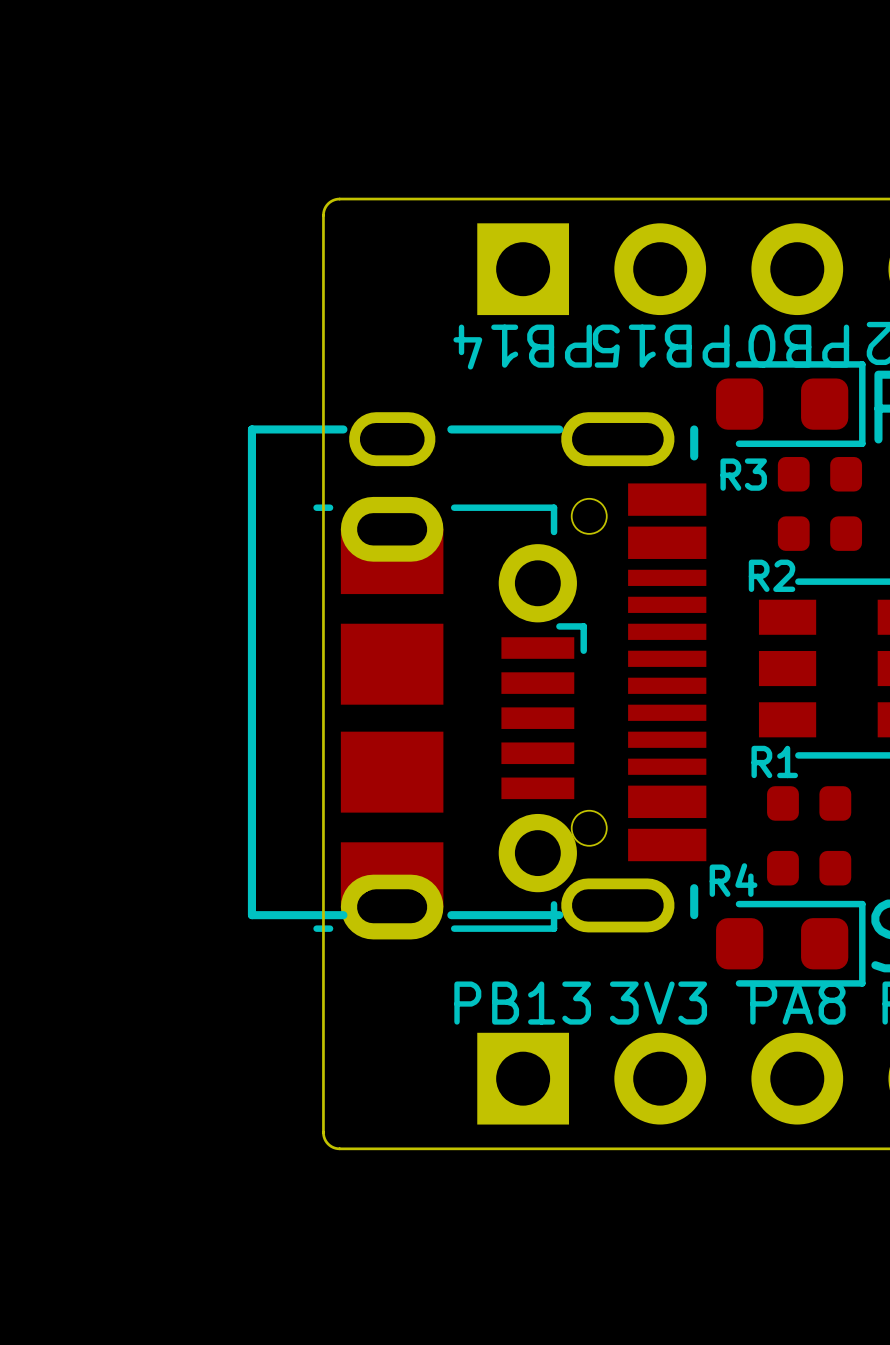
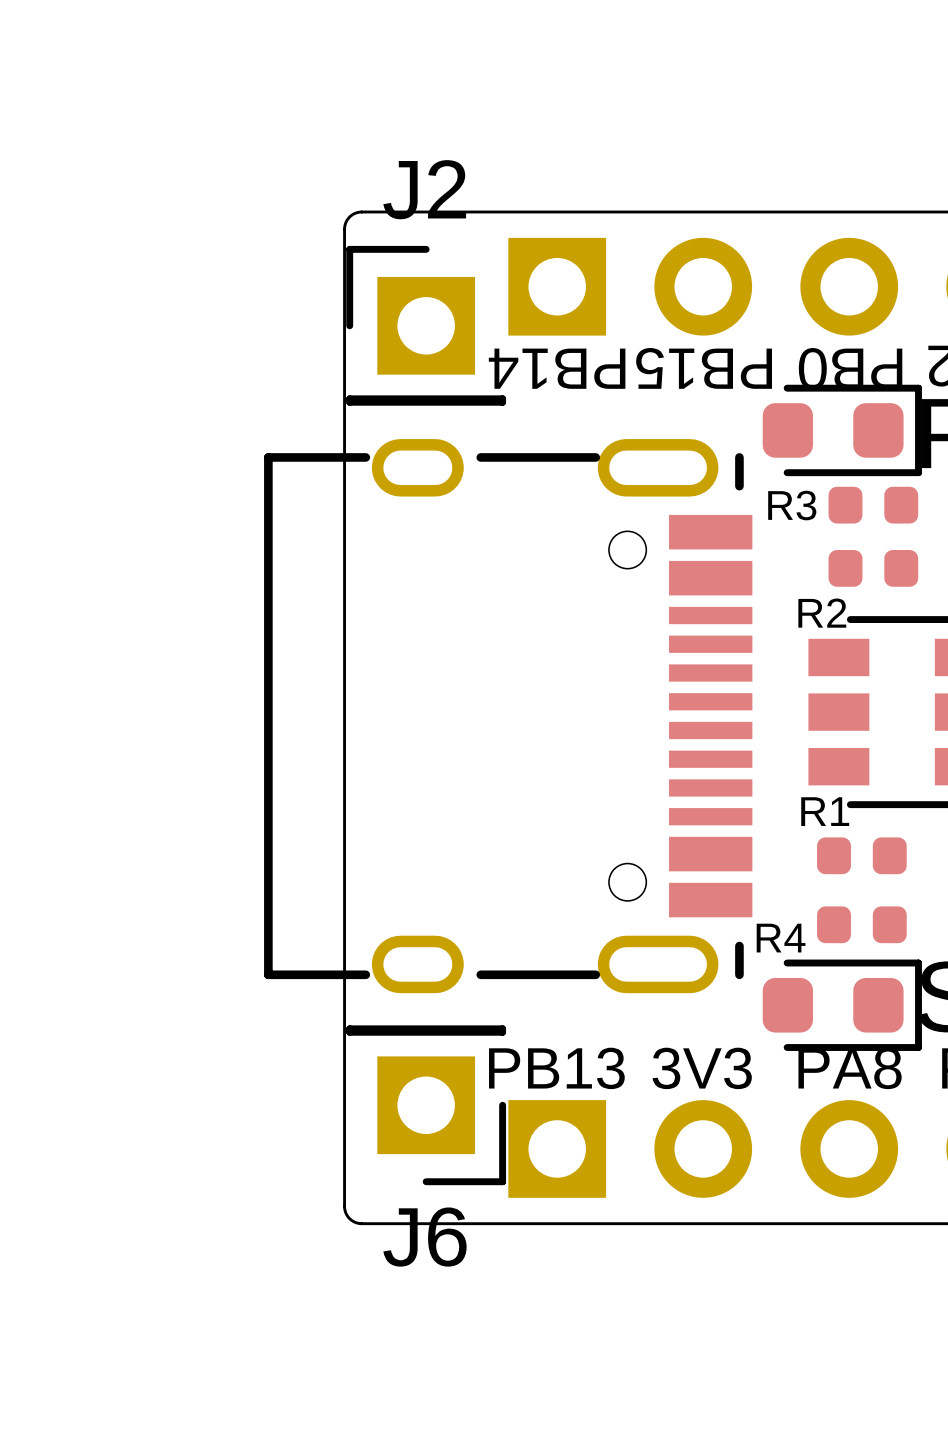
J2: none -> (426, 325)
part: (450, 718) -> none
J6: none -> (426, 1105)

